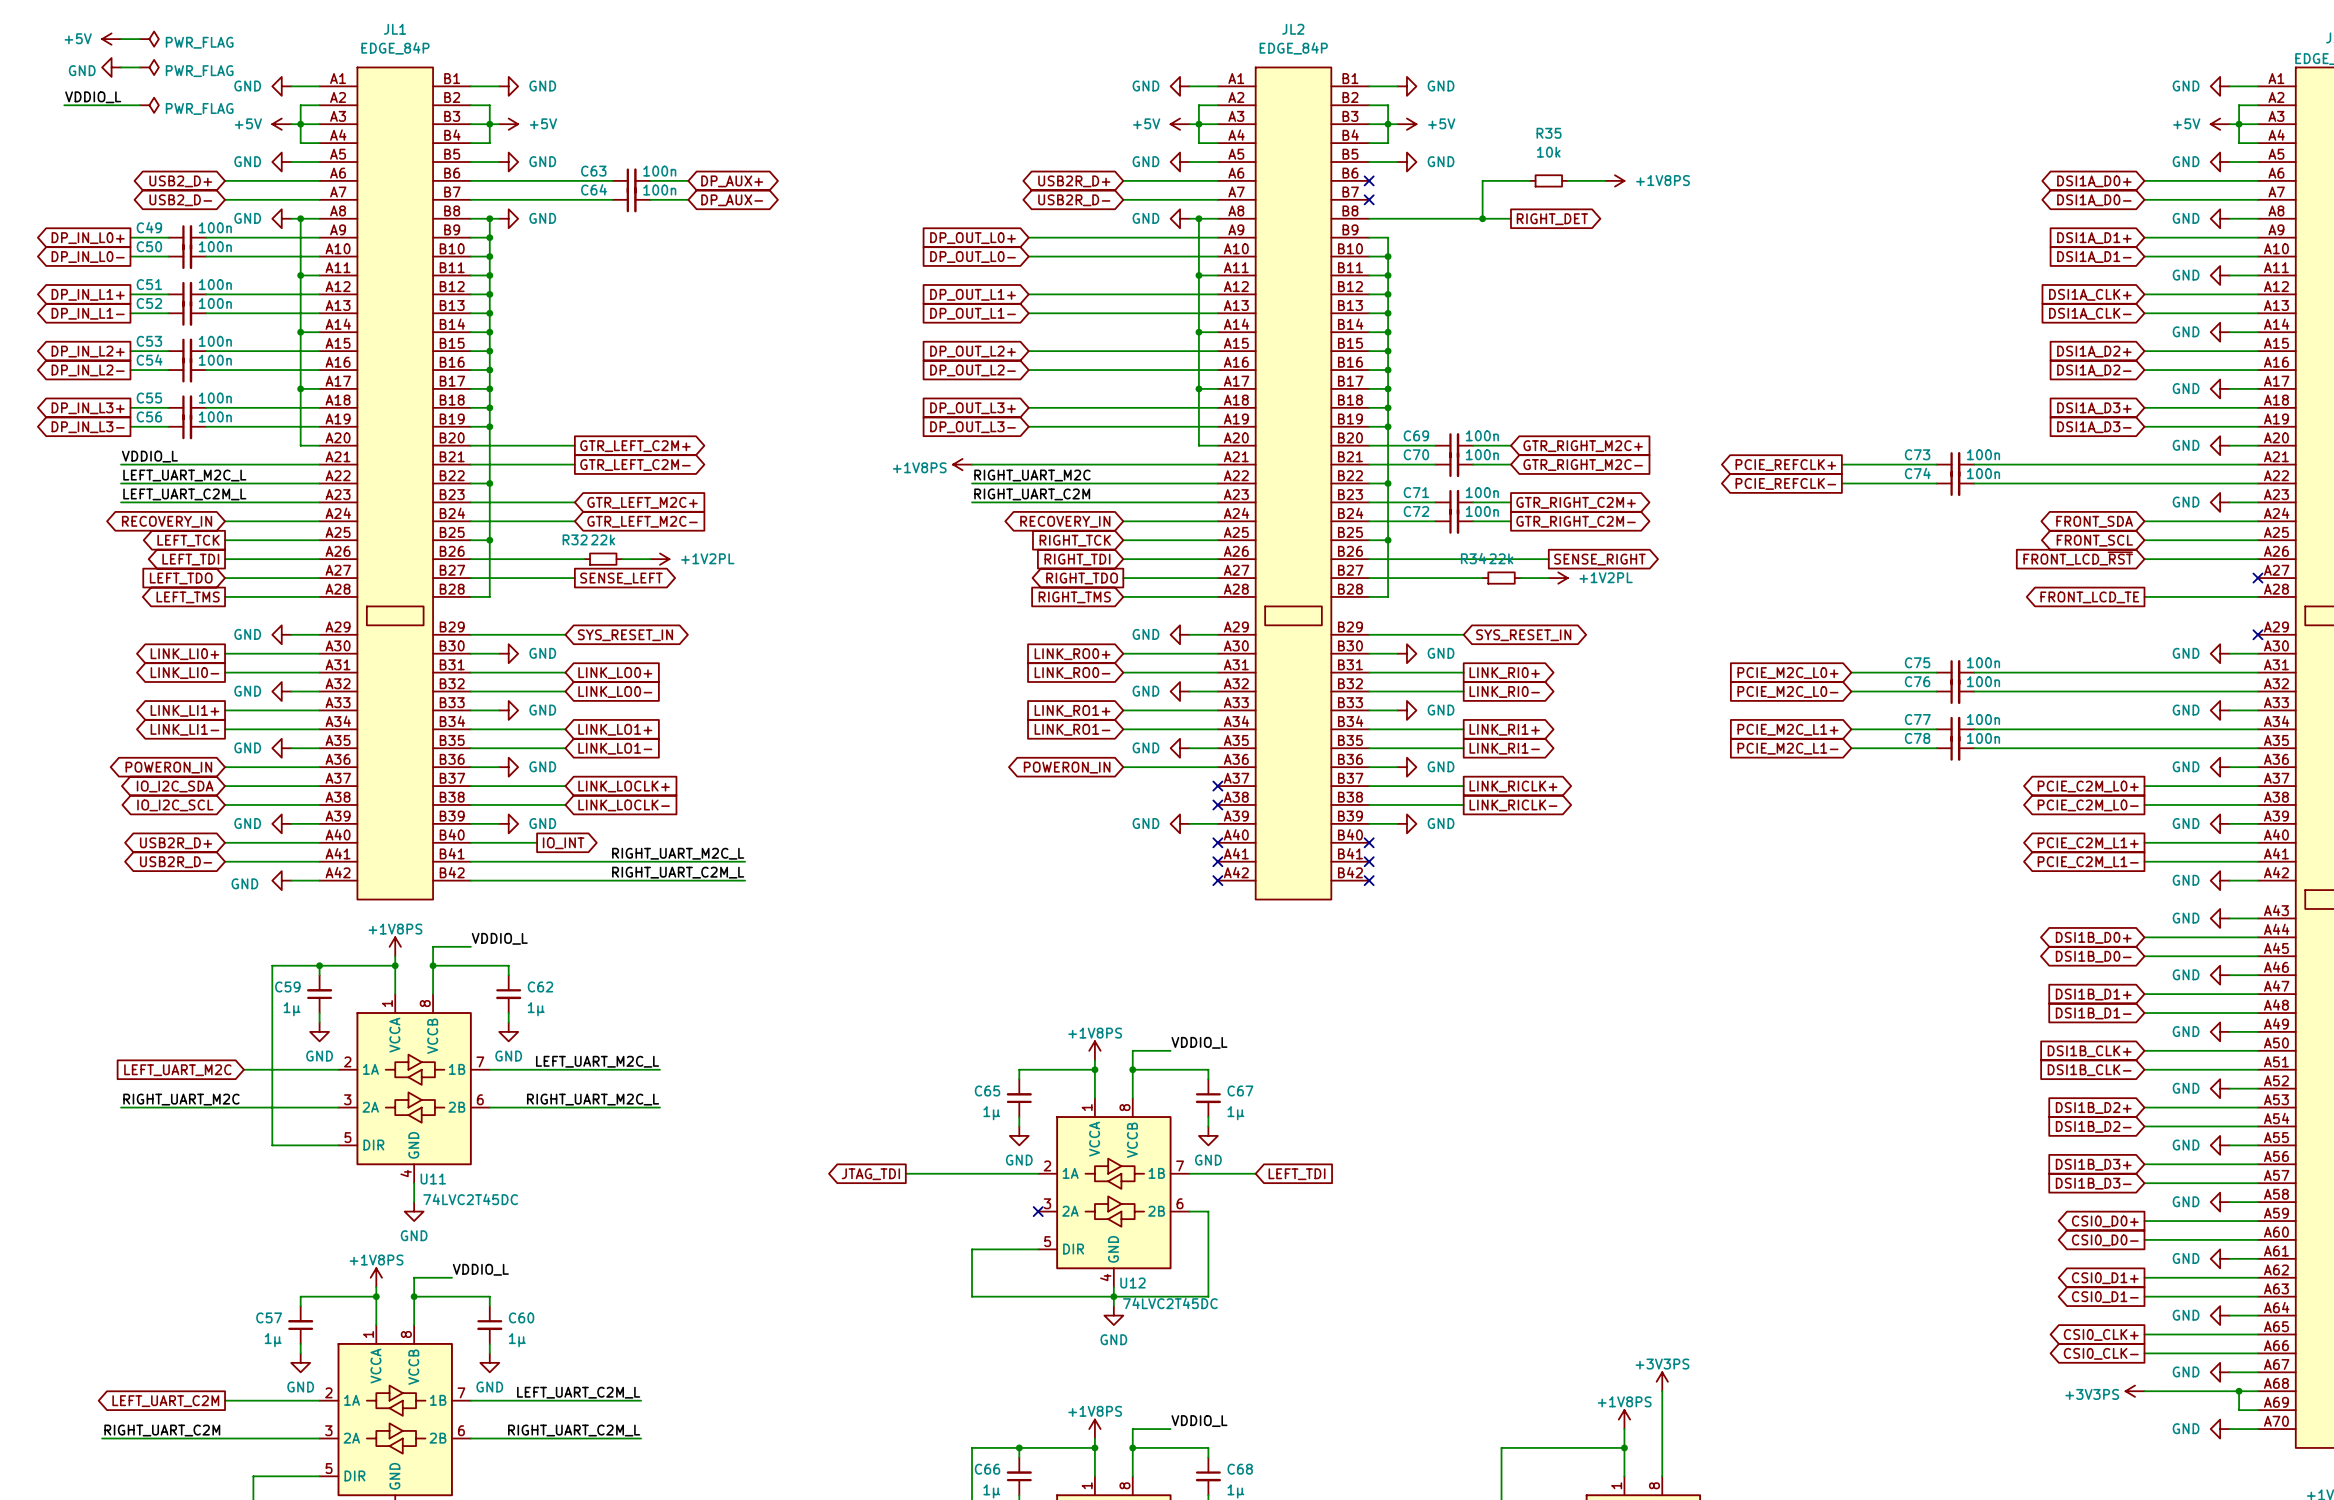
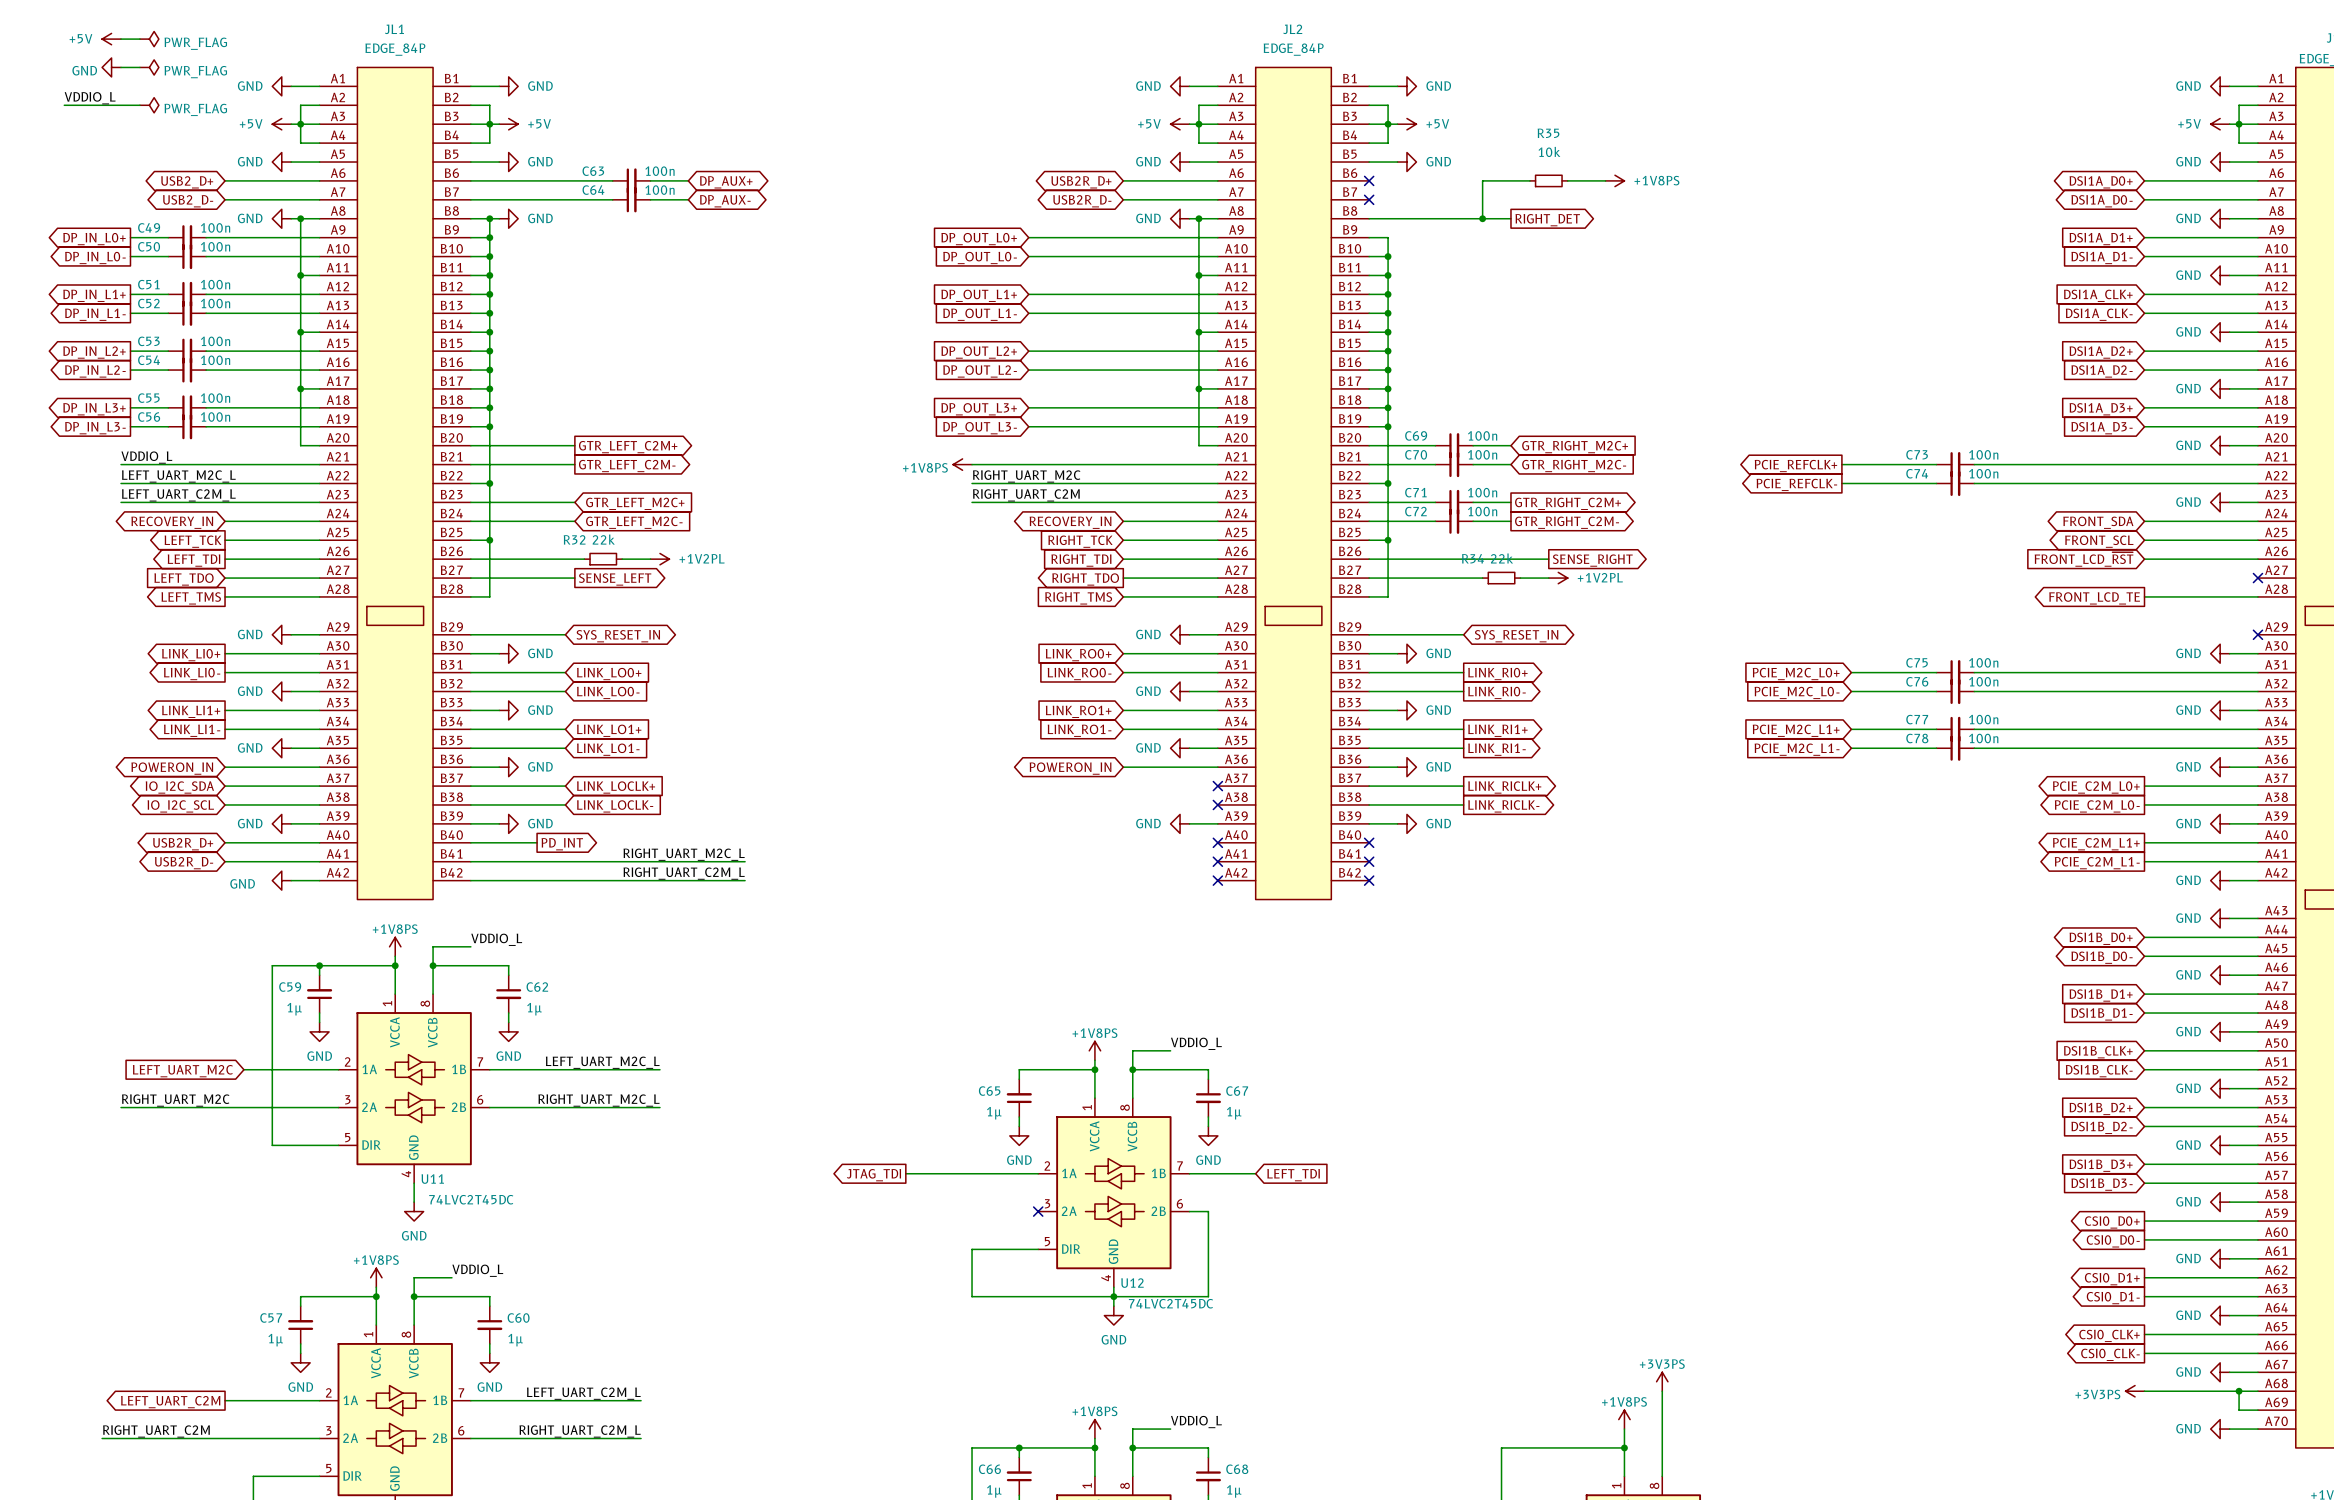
global label: IO_INT (563, 843) -> PD_INT (562, 844)

